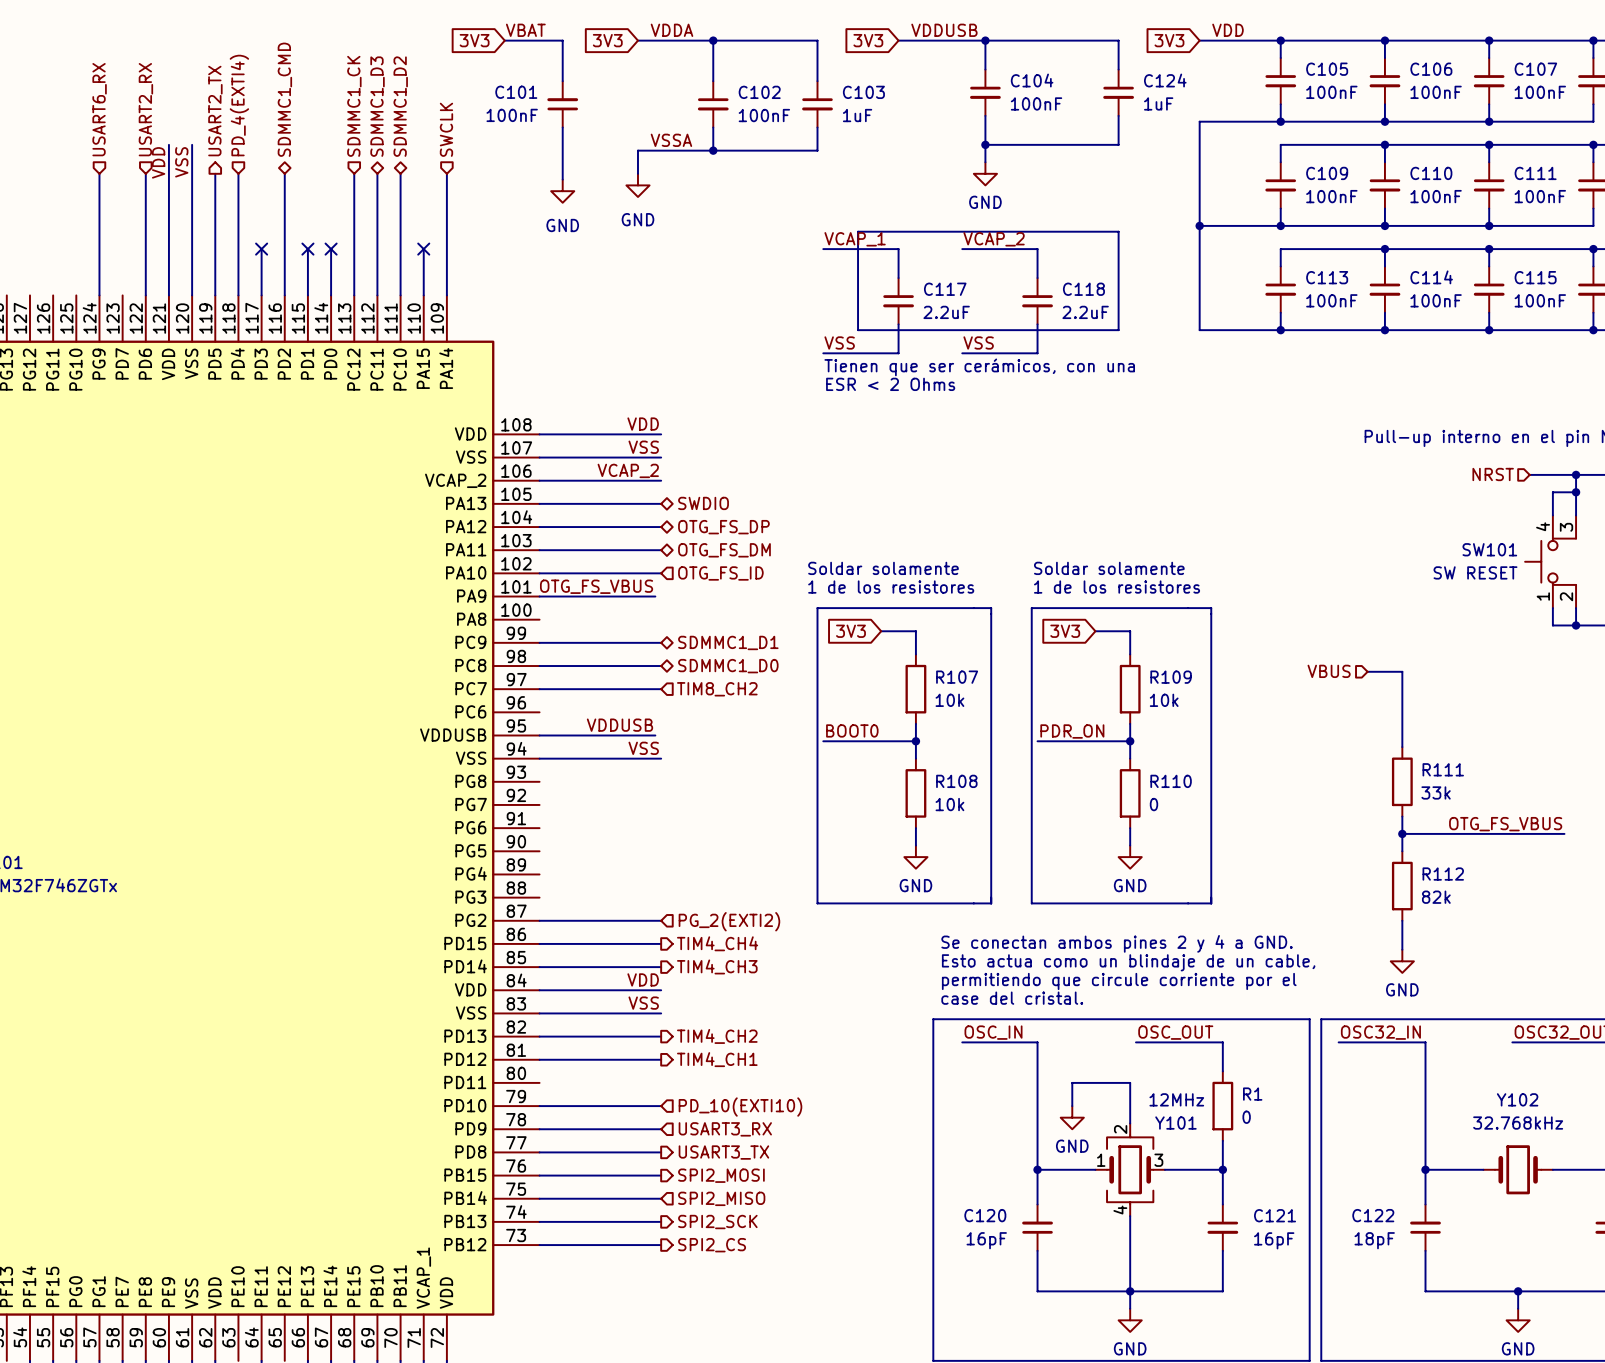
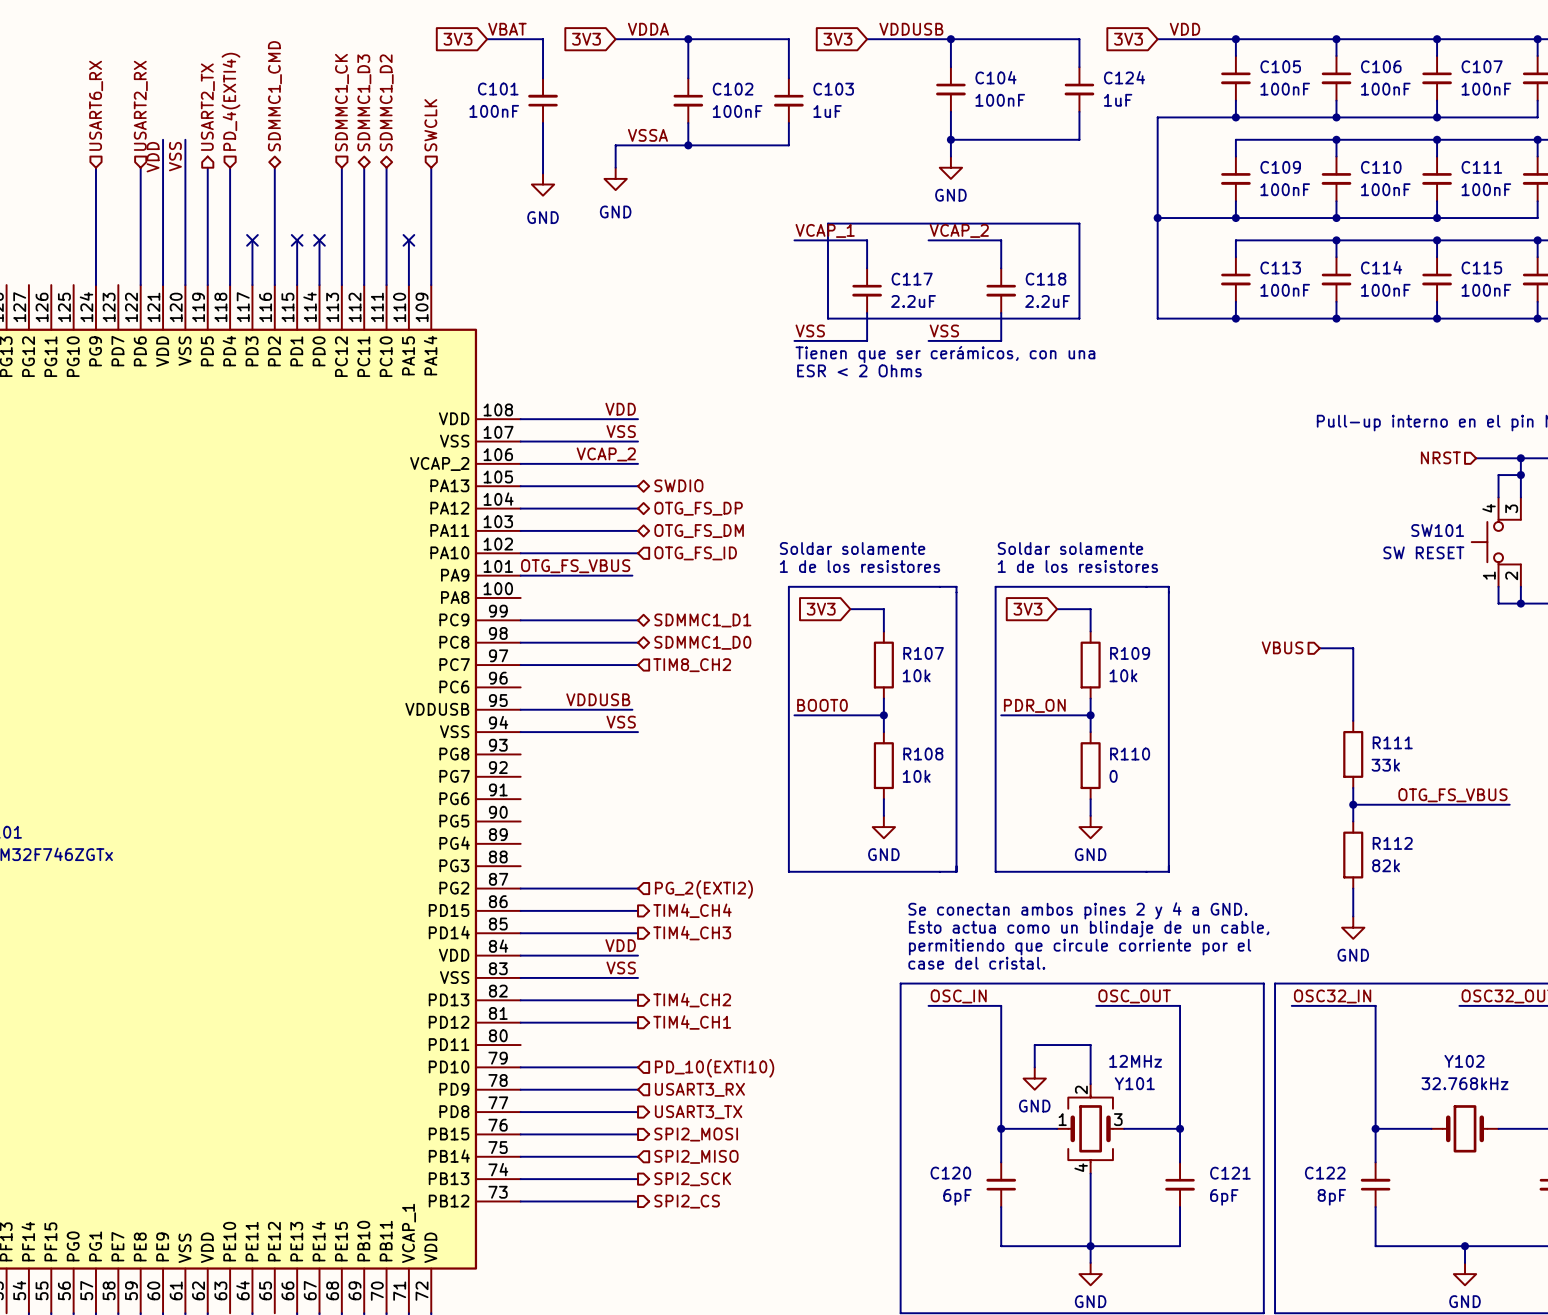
wire: none -> (1180, 1033) (1180, 1100)
R1: 0 (1222, 1106) -> none
C120 value: 16pF (986, 1240) -> 6pF (957, 1197)
C121 value: 16pF (1274, 1240) -> 6pF (1224, 1197)
C122 value: 18pF (1374, 1240) -> 8pF (1331, 1197)

